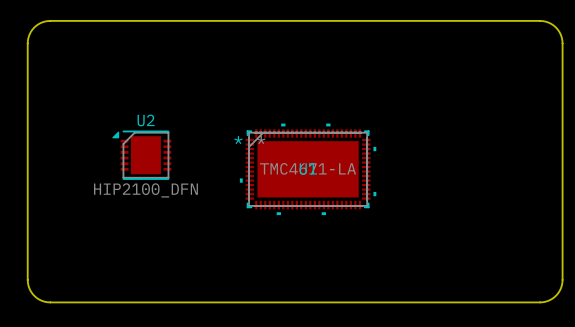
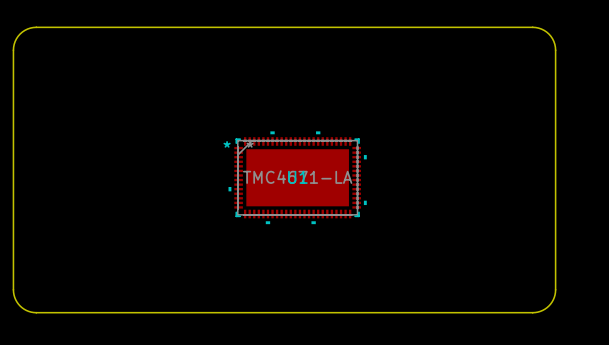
U2: HIP2100_DFN (141, 155) -> none

